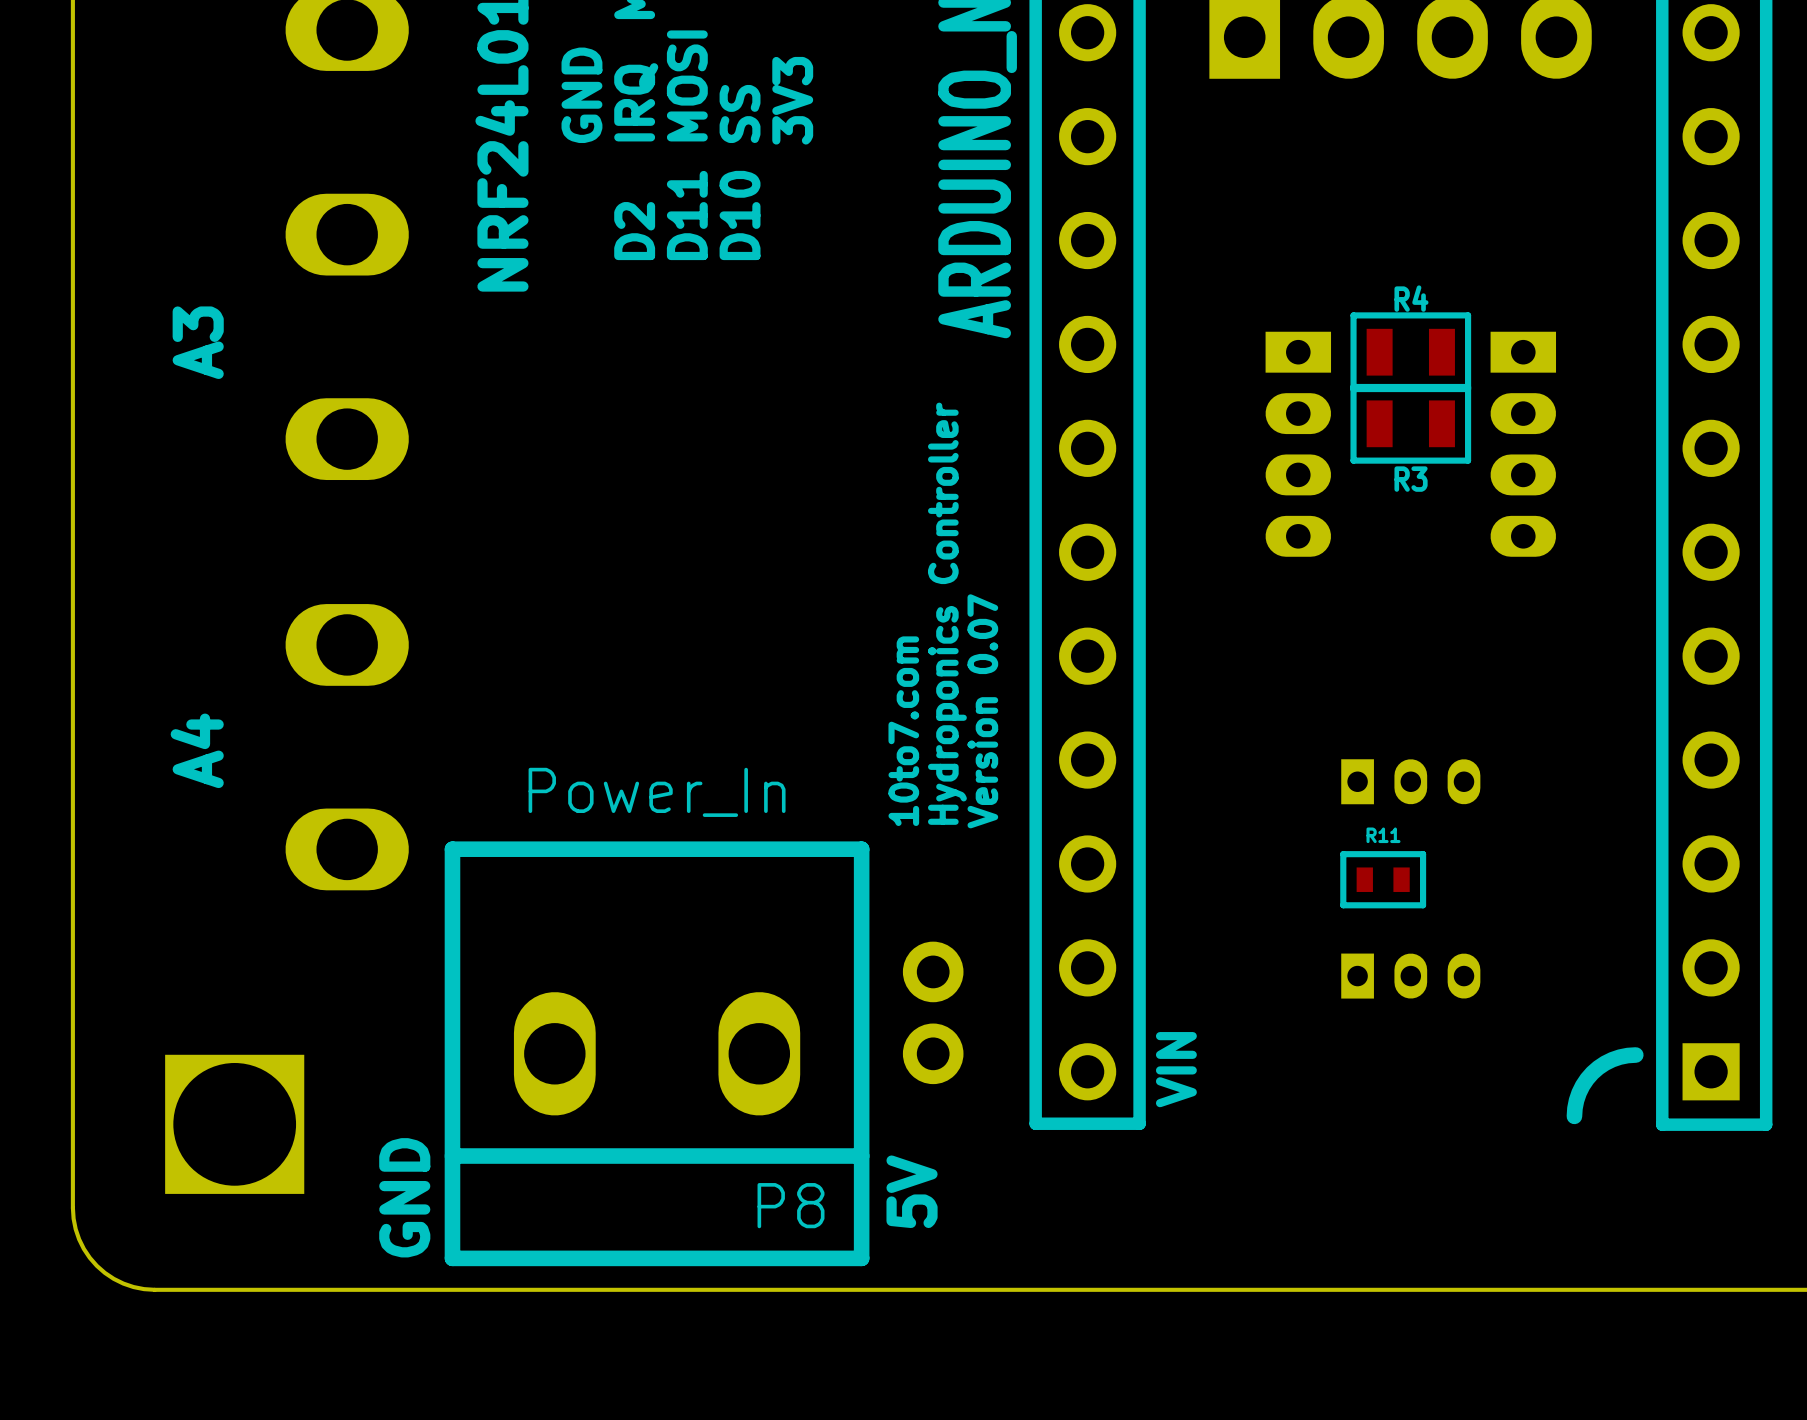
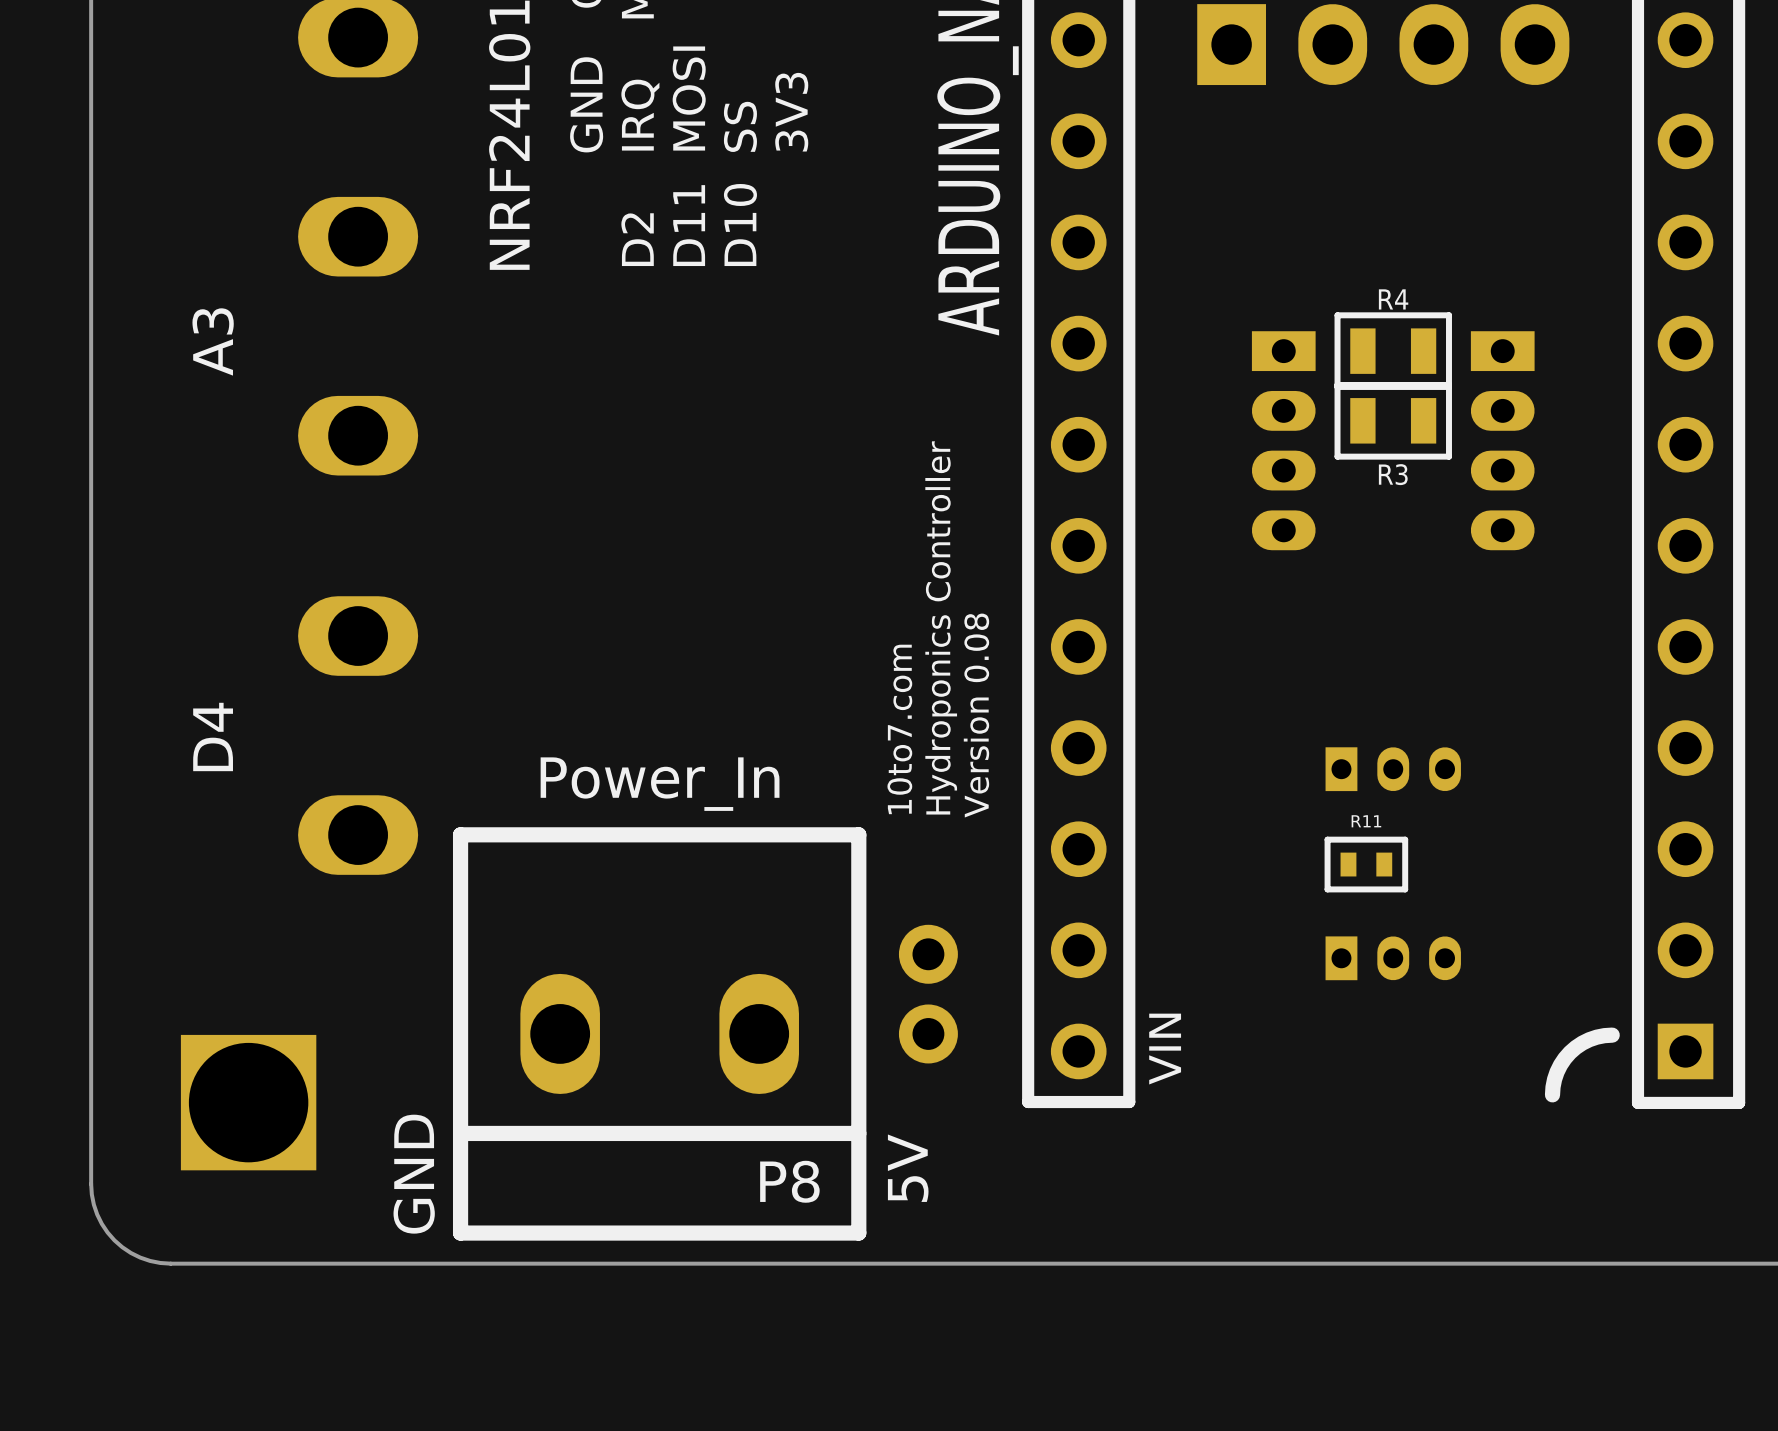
text: Version 0.07 (982, 711) -> Version 0.08 (976, 715)
text: A4 (197, 750) -> D4 (213, 736)

